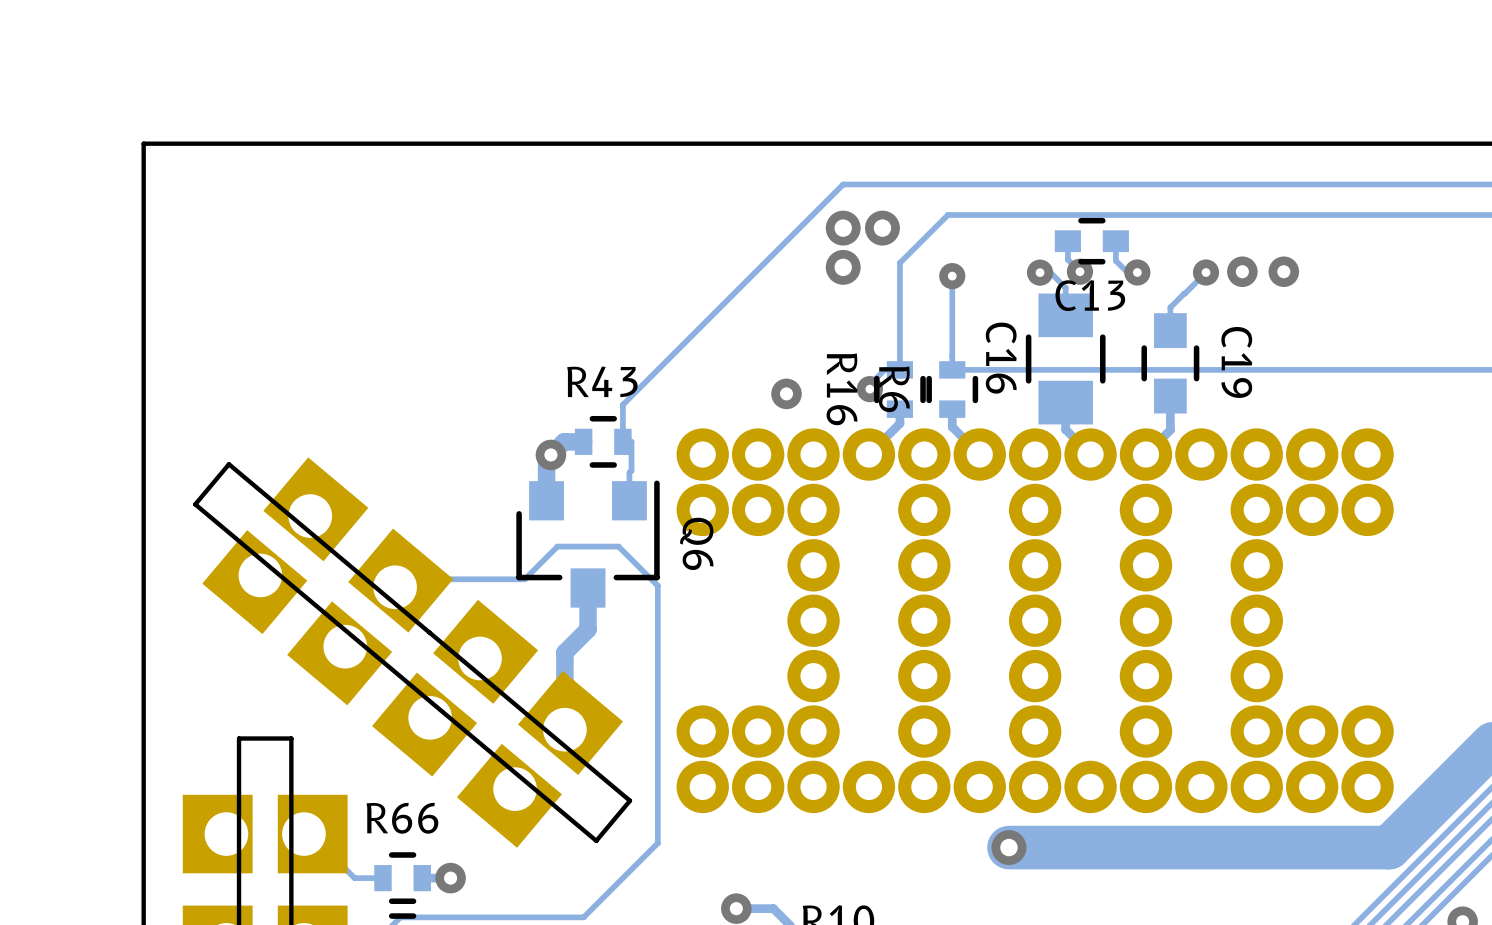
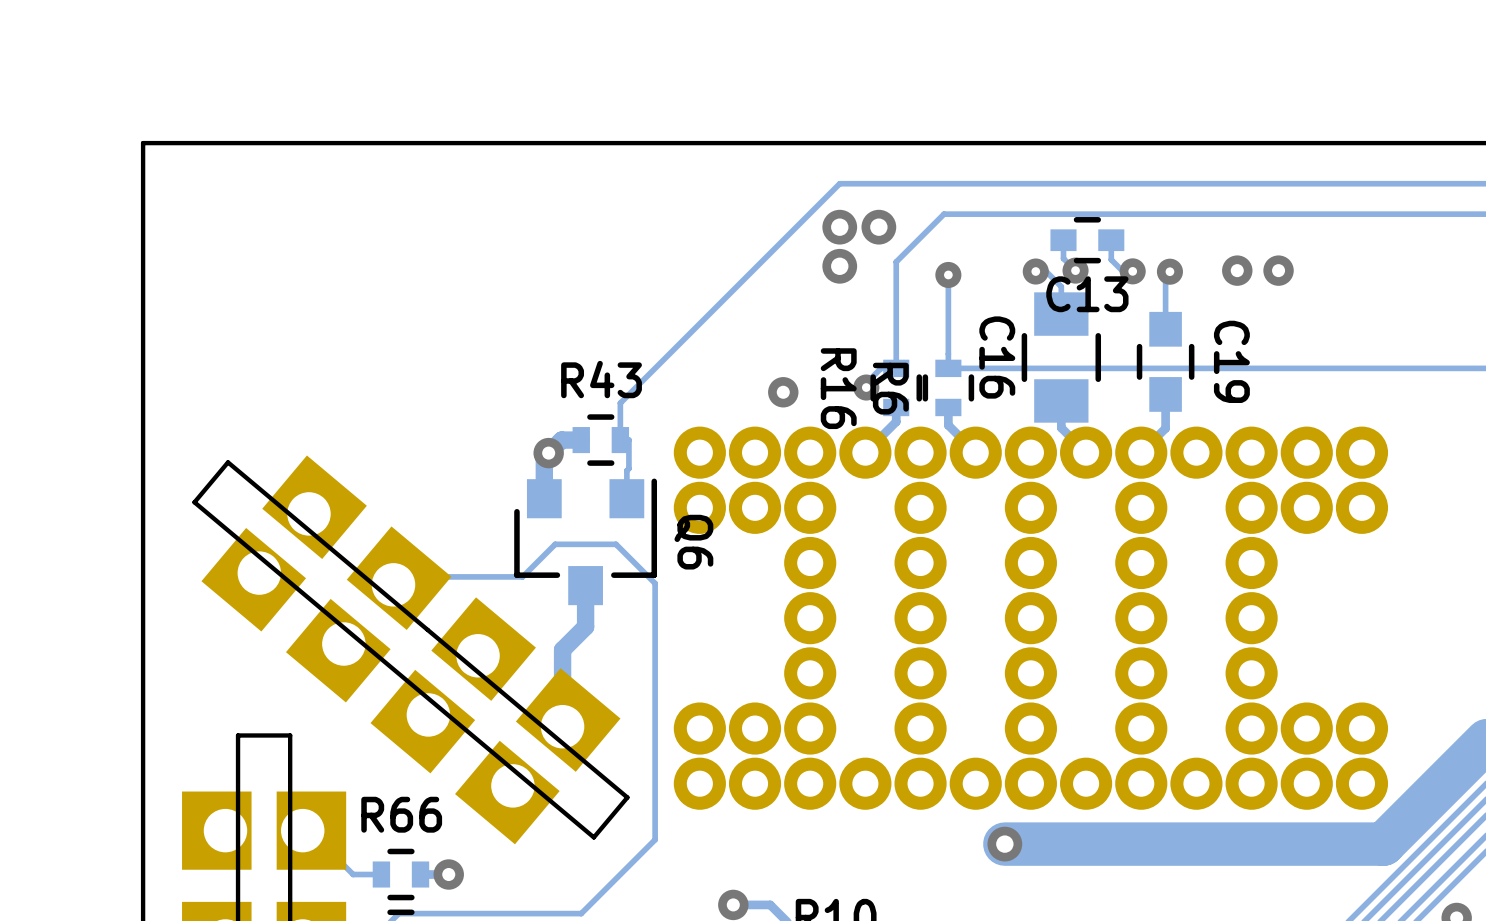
track: (1206, 272) (1184, 293) -> none
via position: (1206, 272) -> (1169, 271)
track: (1184, 293) (1170, 307) -> (1169, 271) (1165, 276) (1165, 306)

